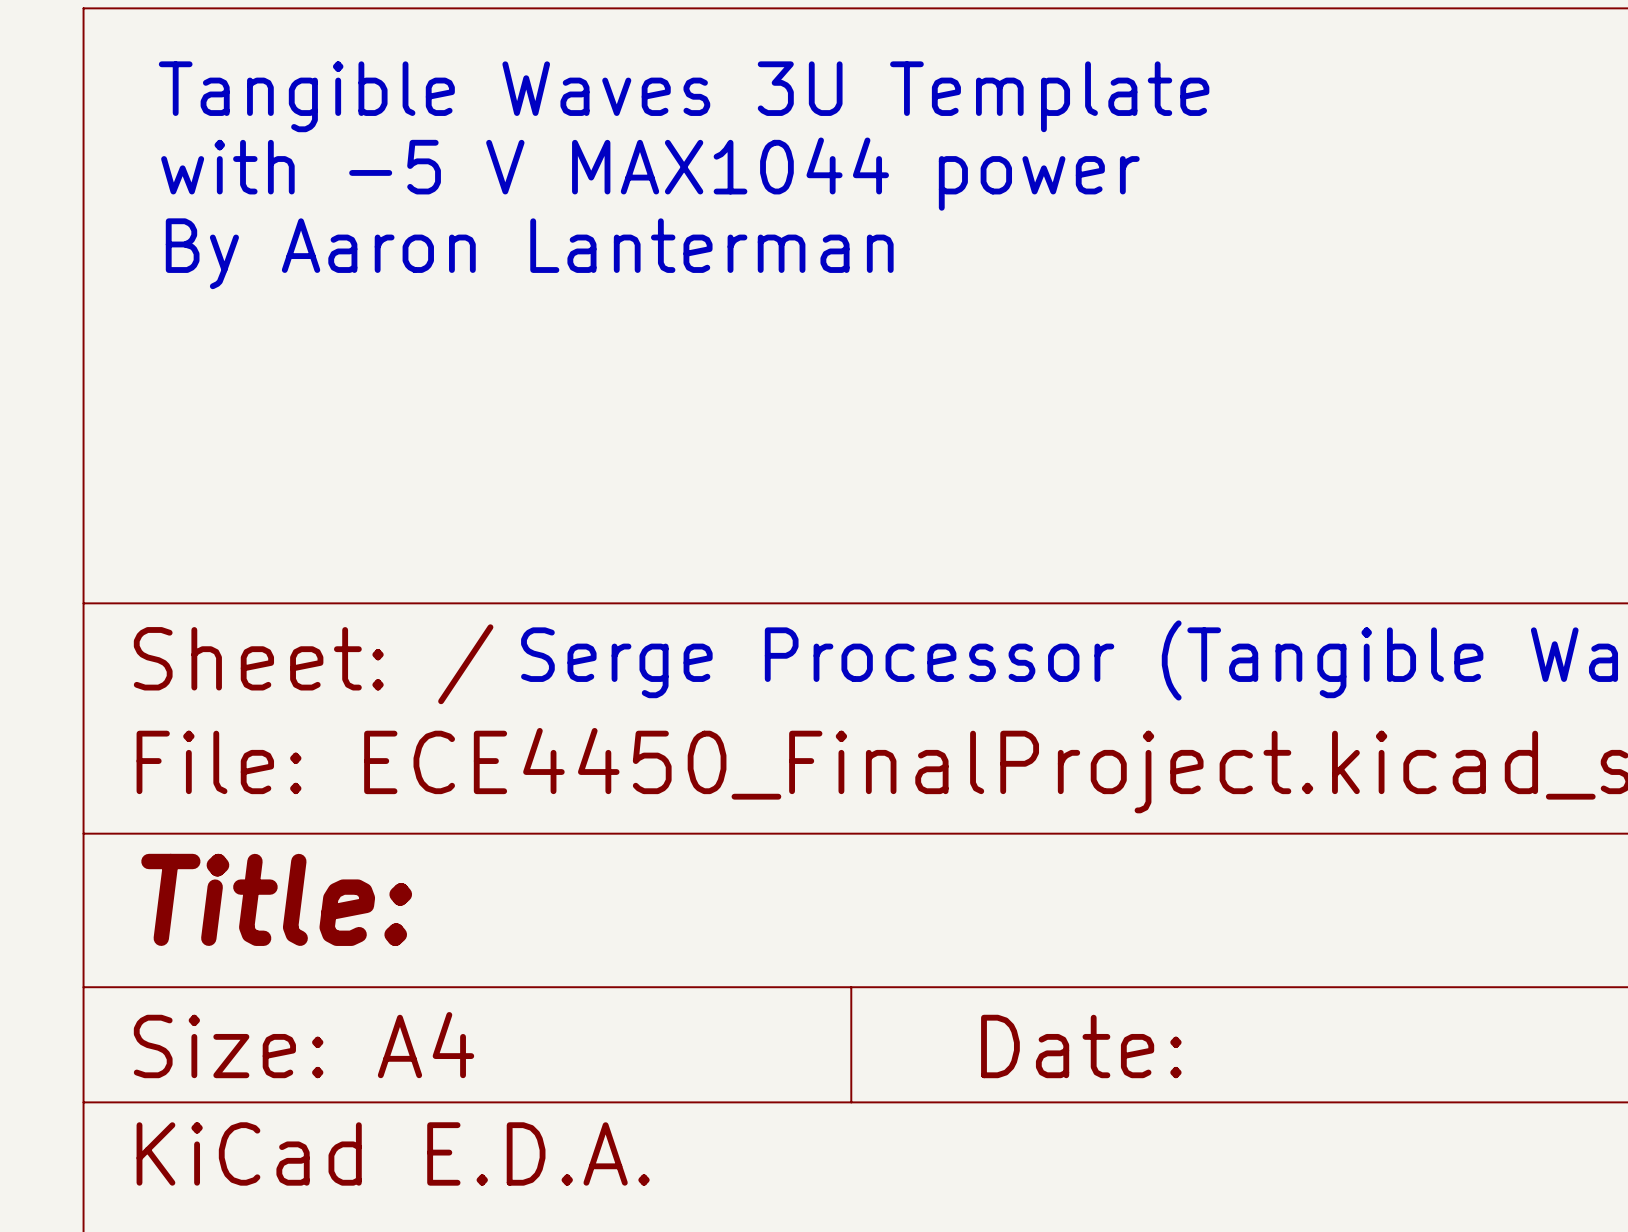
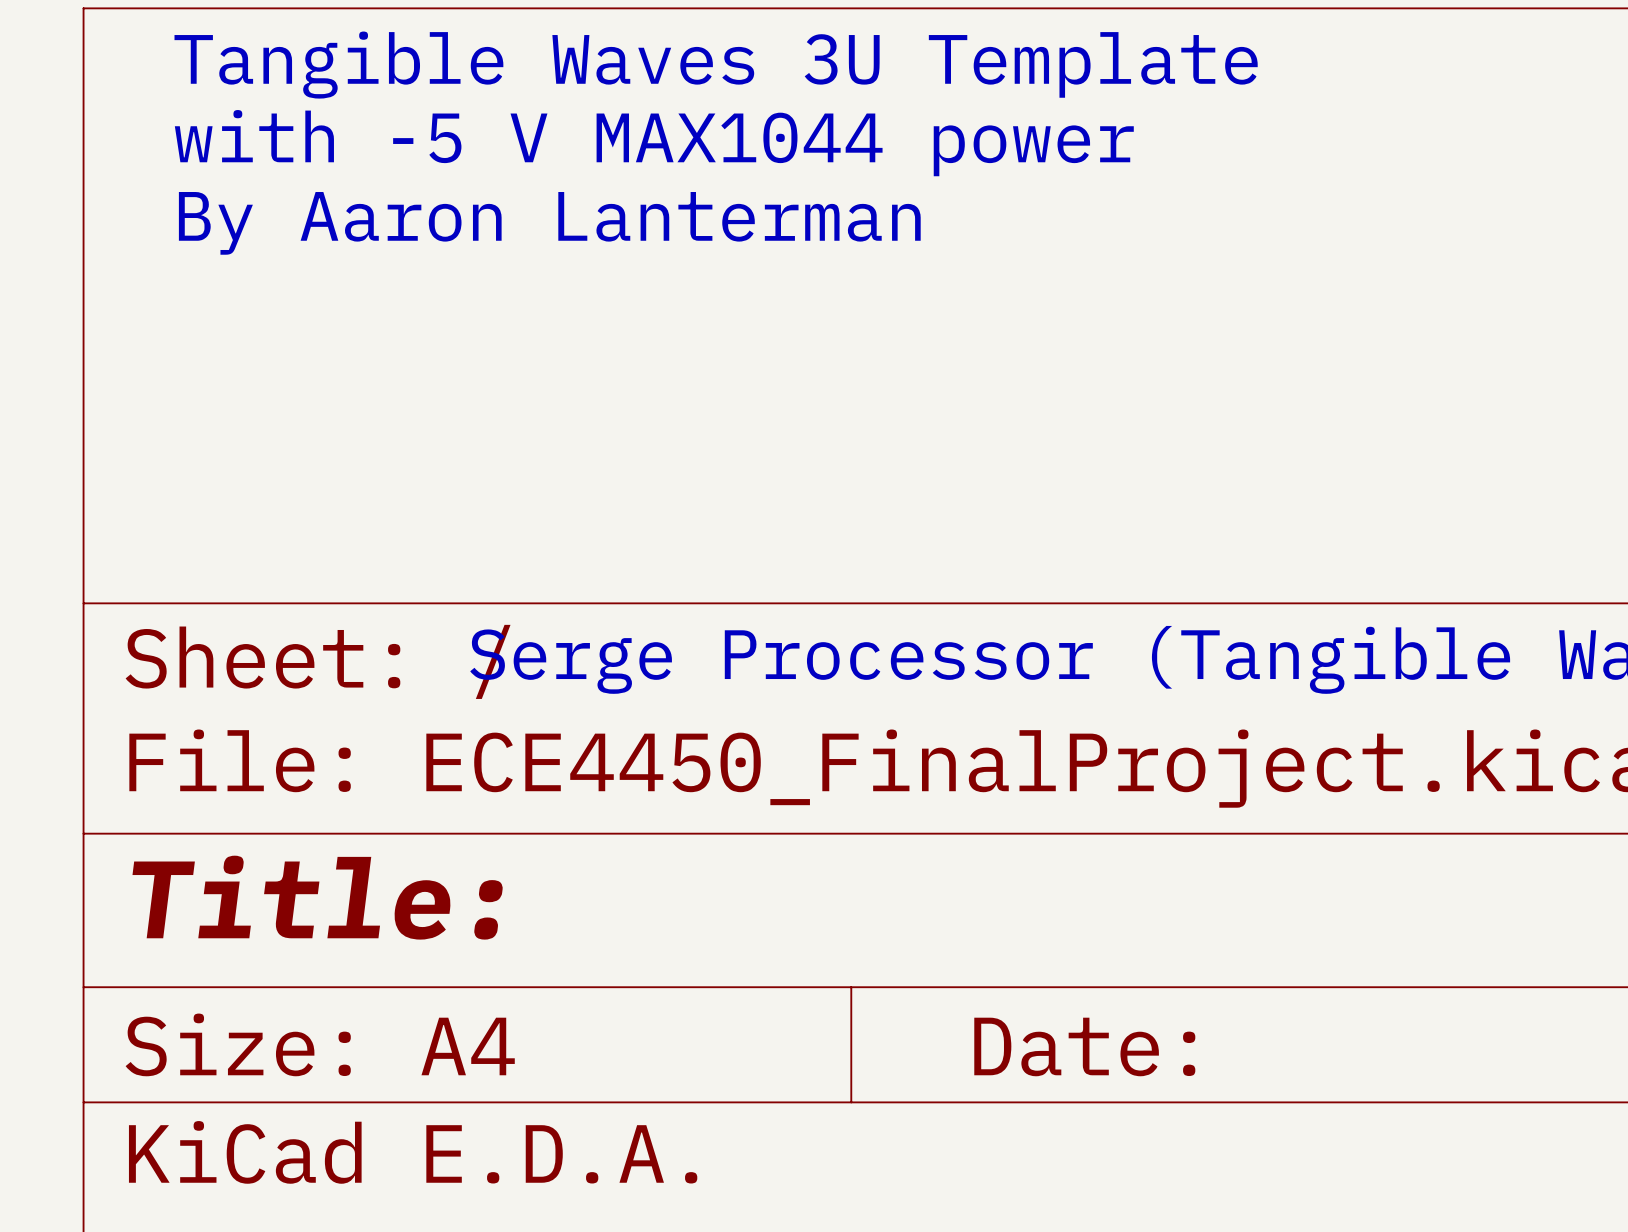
text position: Tangible Waves 3U Template (684, 96) -> Tangible Waves 3U Template (716, 65)
text position: with -5 V MAX1044 power (650, 174) -> with -5 V MAX1044 power (654, 143)
text position: By Aaron Lanterman (529, 253) -> By Aaron Lanterman (549, 223)

